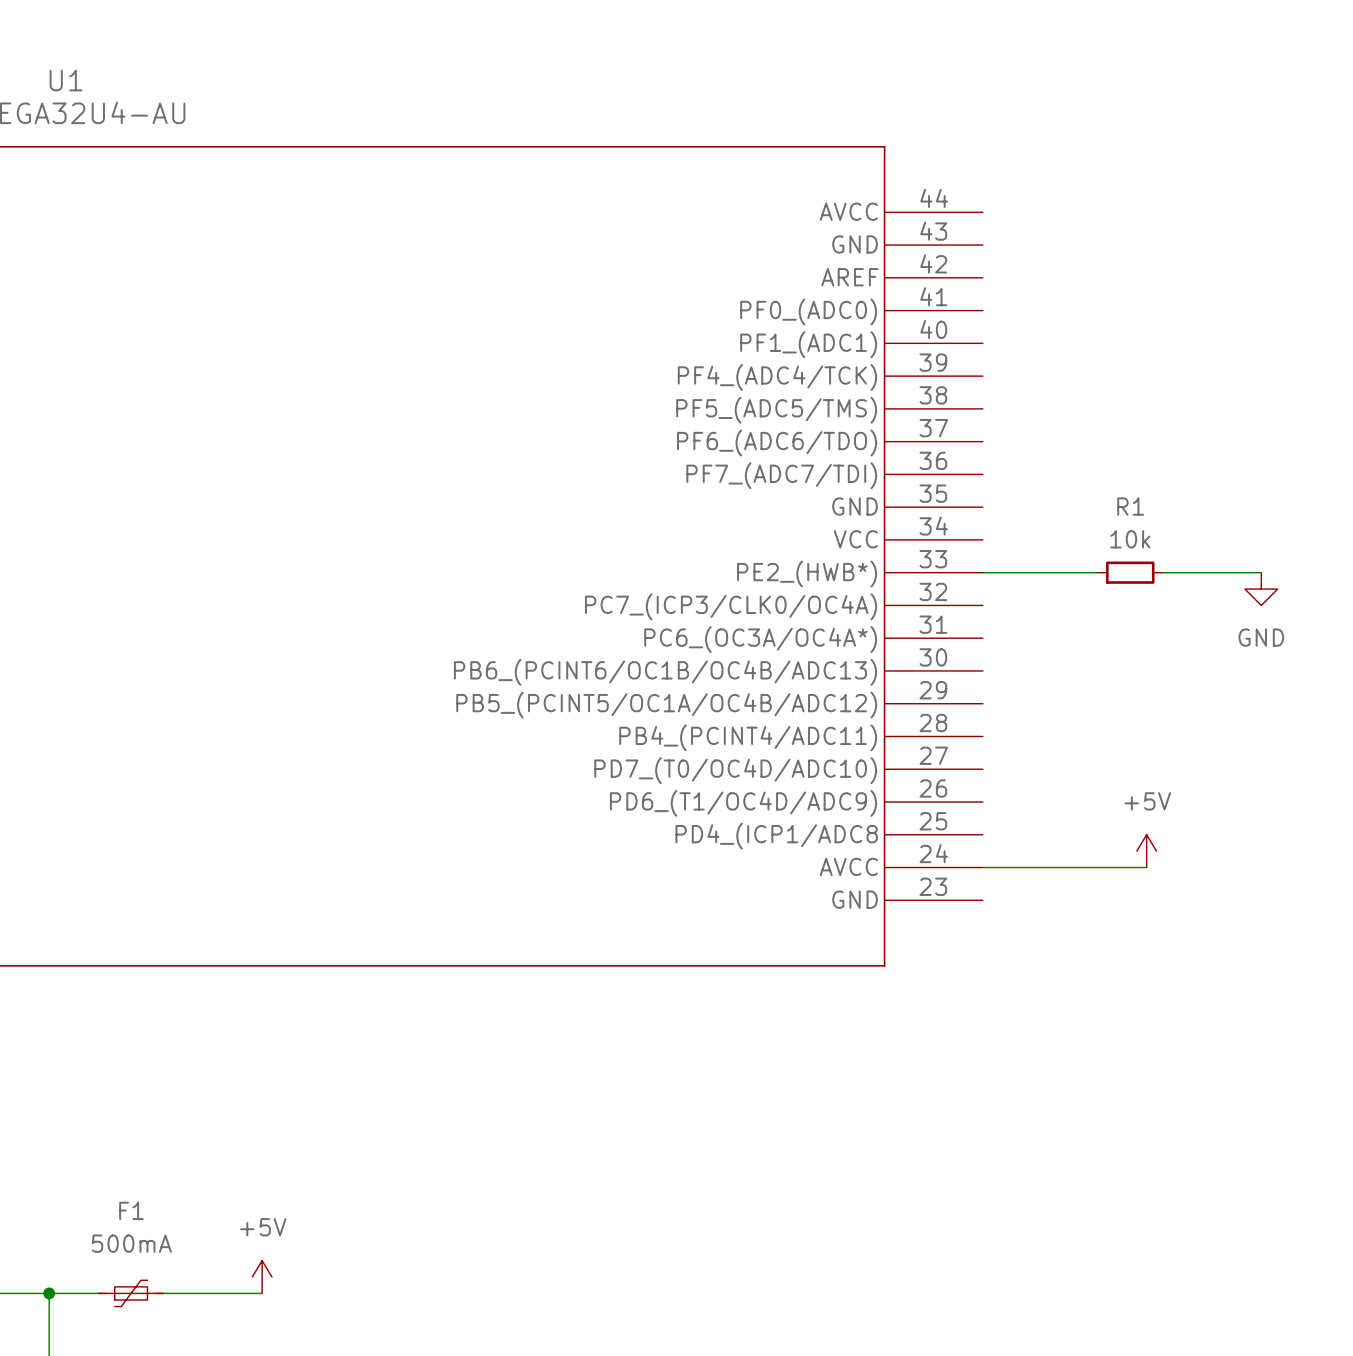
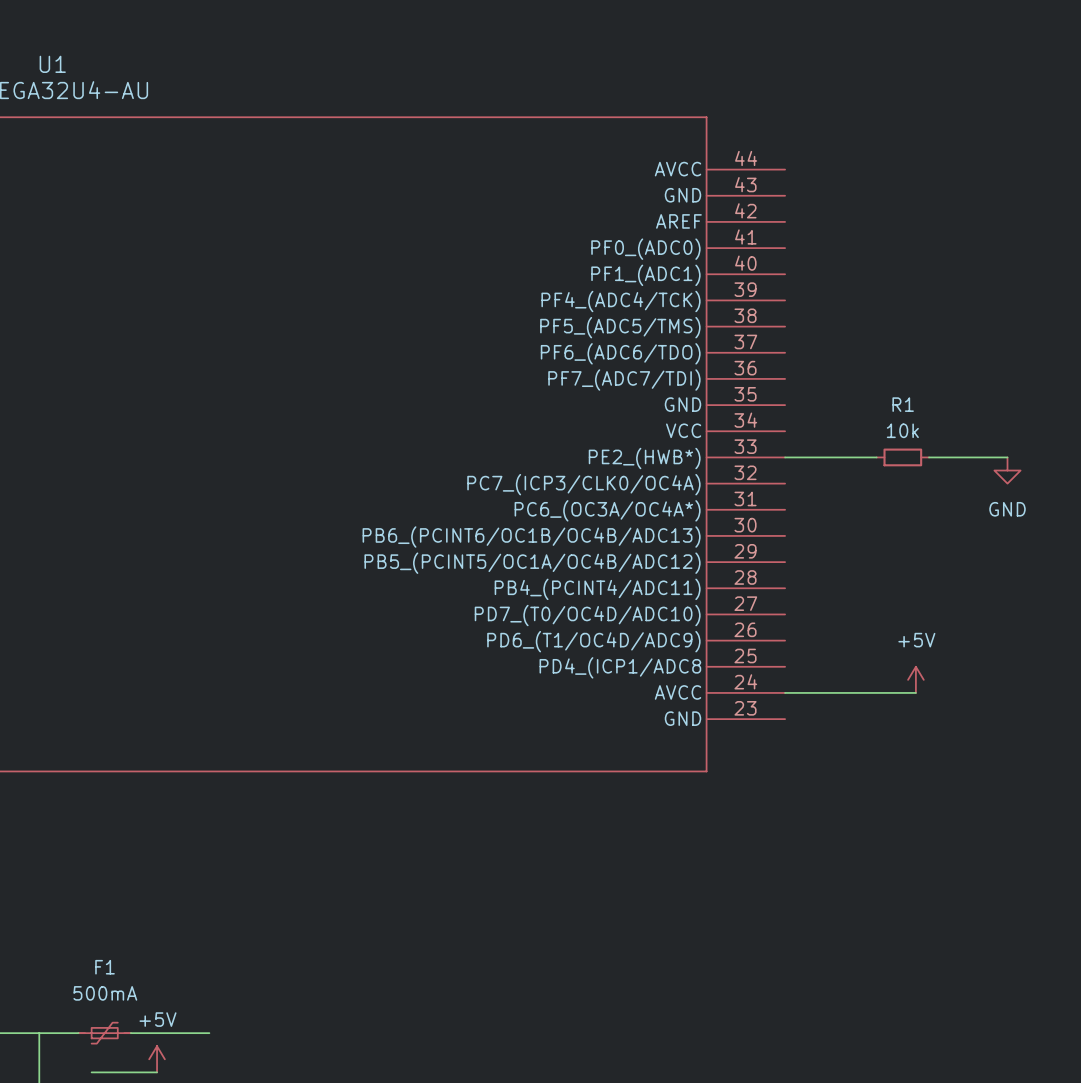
power symbol position: +5V (262, 1277) -> +5V (157, 1059)
junction: (49, 1293) -> none
wire: none -> (91, 1072) (157, 1072)

